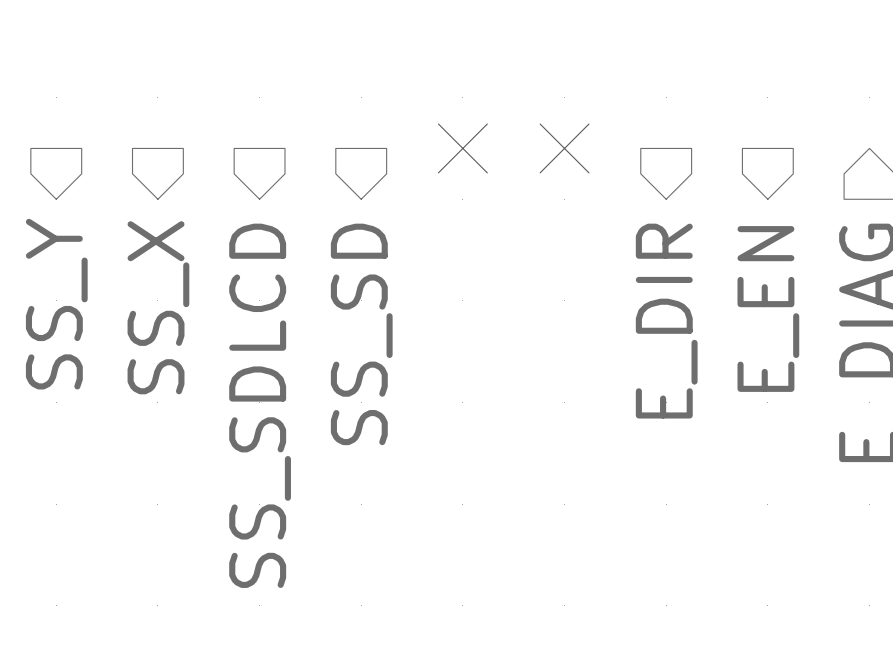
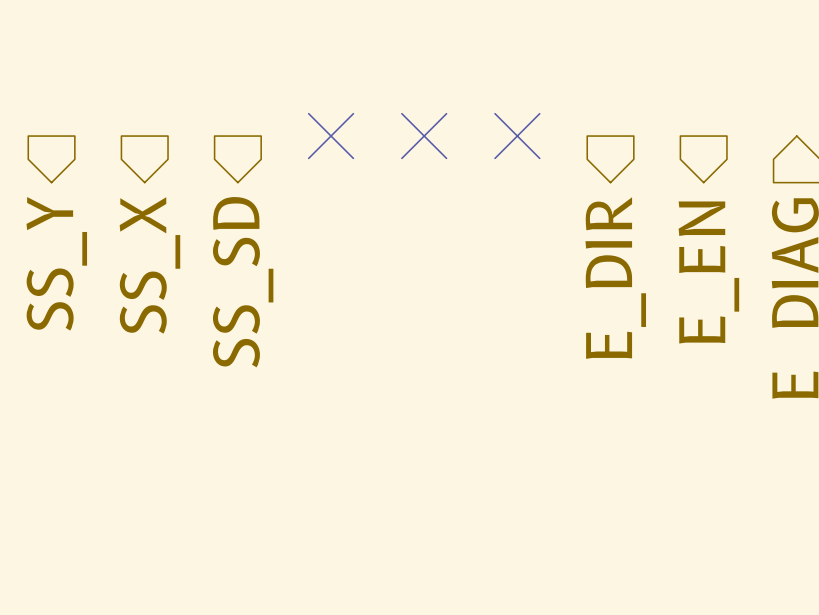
no-connect mark: none -> (331, 136)
hierarchical label: SS_SD (361, 334) -> none
hierarchical label: SS_SDLCD (260, 405) -> SS_SD (243, 282)

